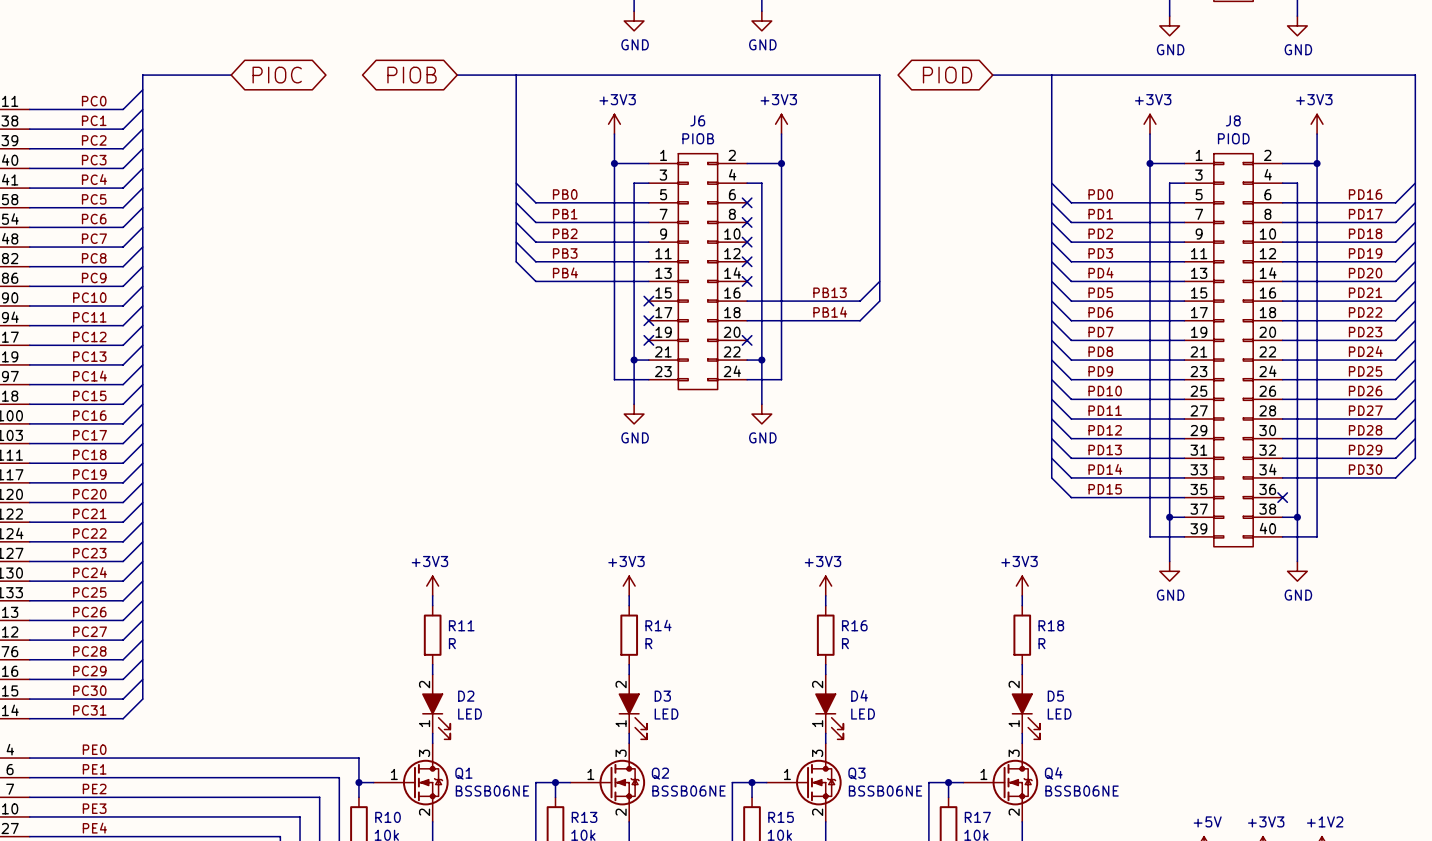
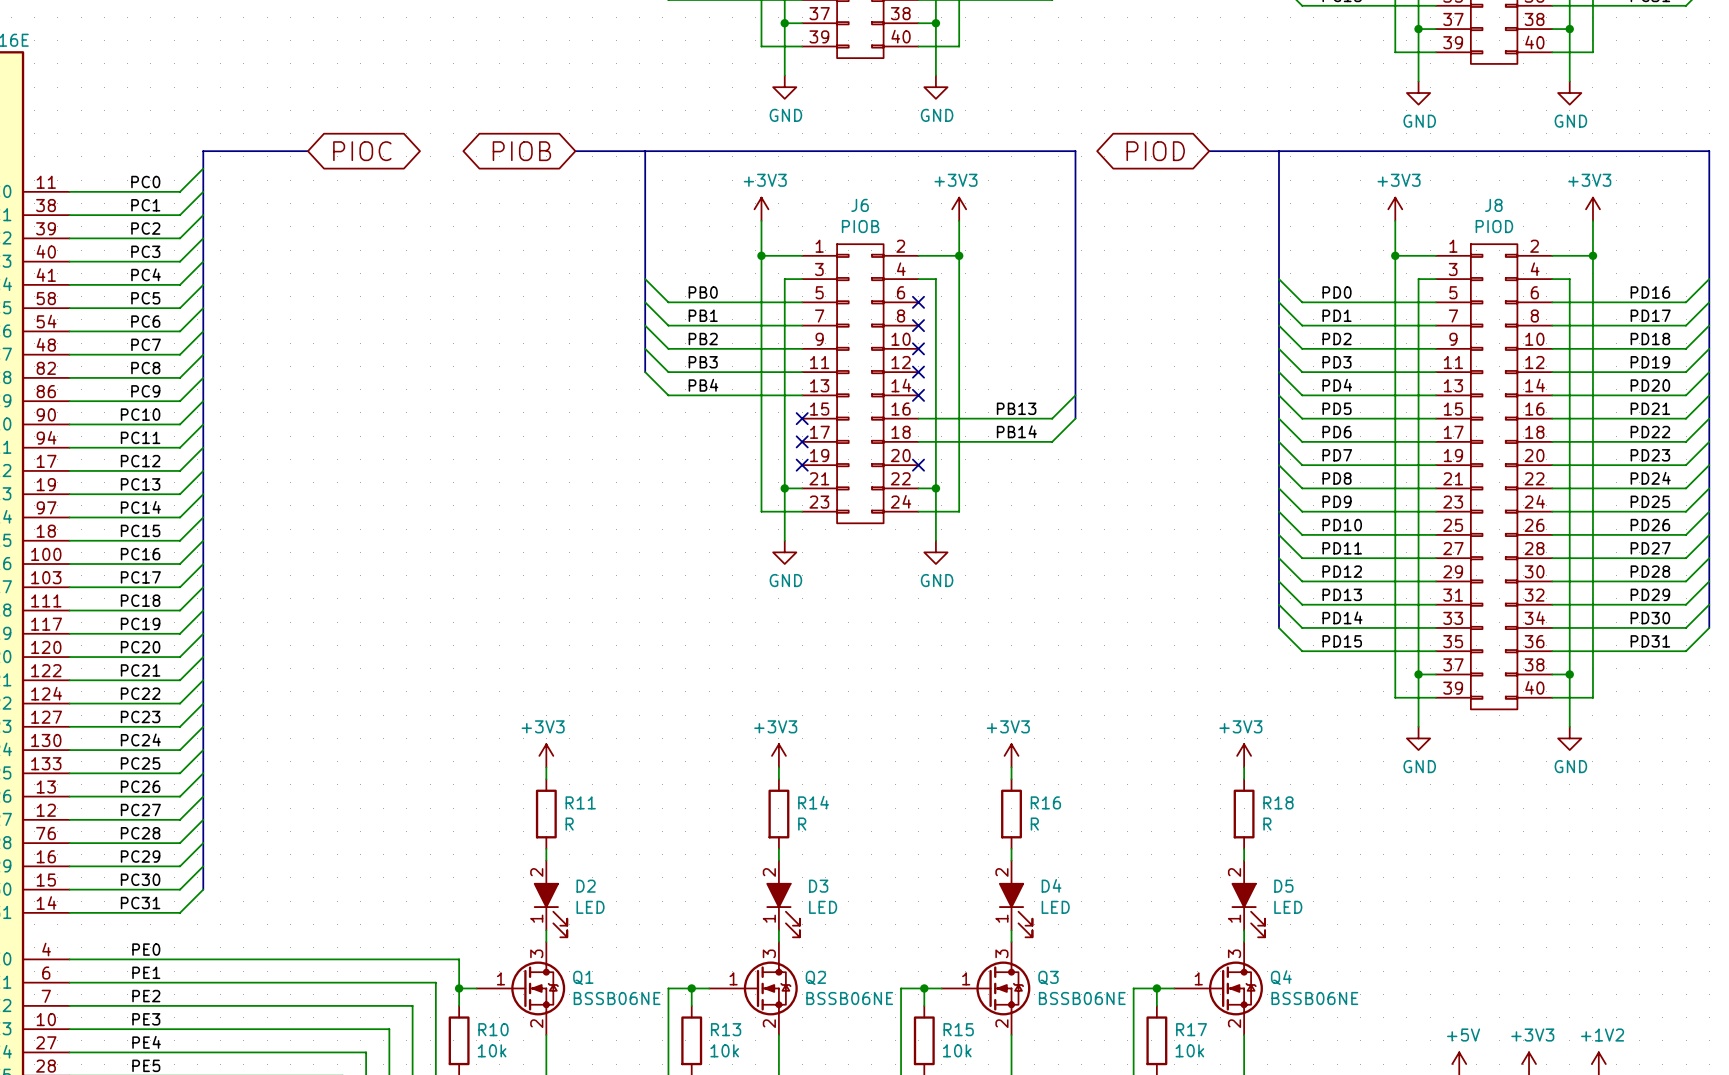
bus: none -> (1709, 604) (1709, 627)
wire: none -> (1709, 627) (1686, 651) (1552, 651)
label: none -> PD31 (1650, 641)
no-connect mark: (1282, 497) -> none

